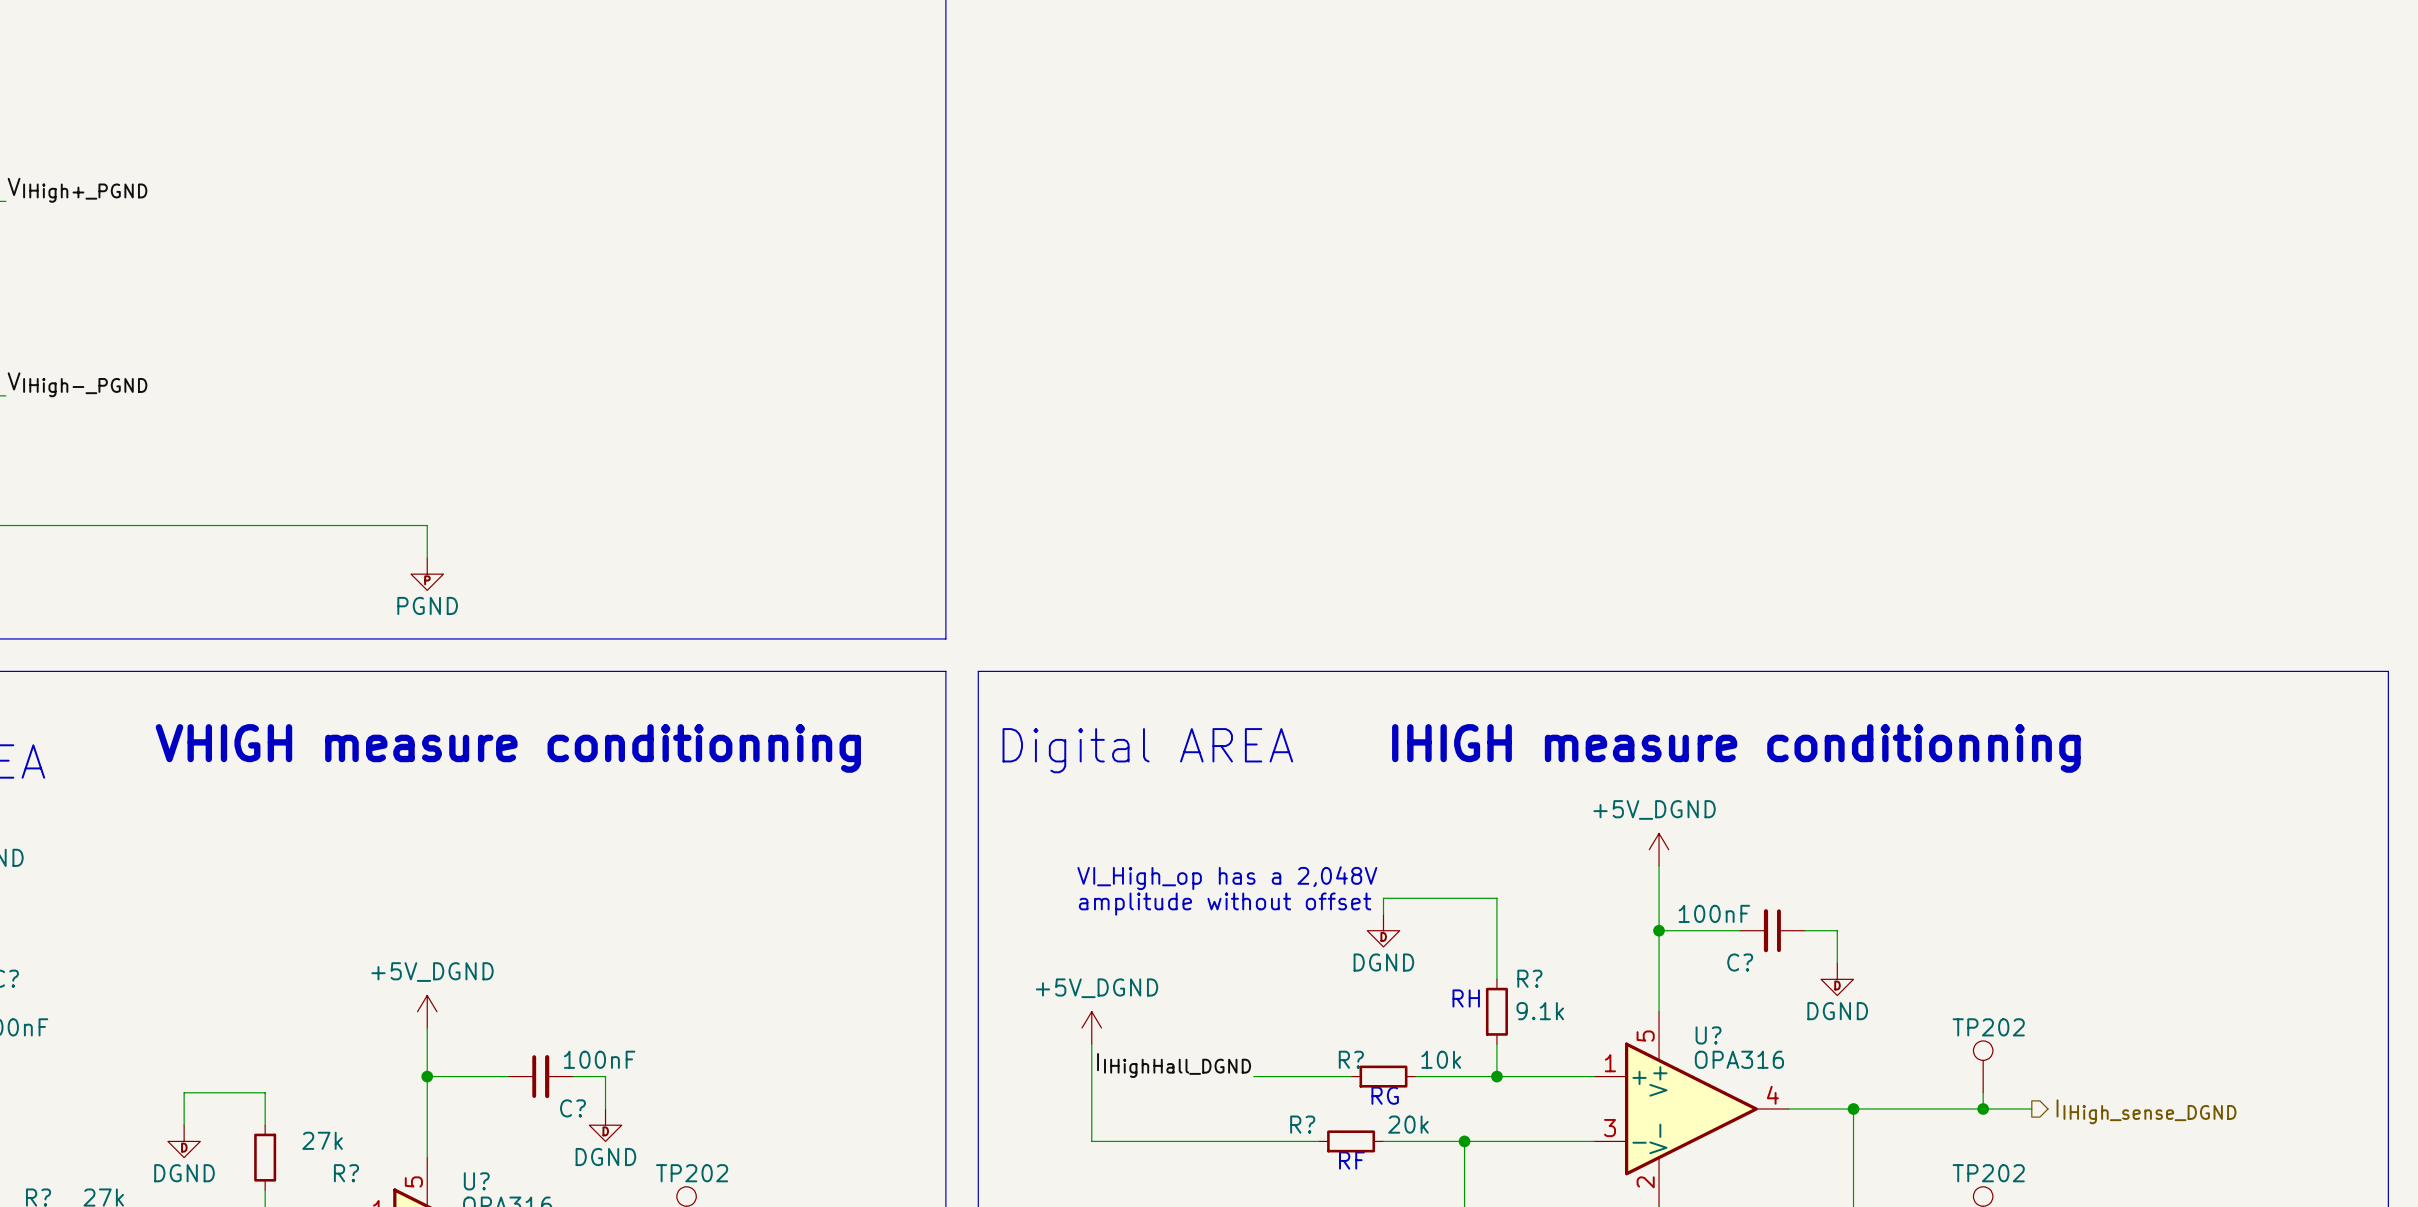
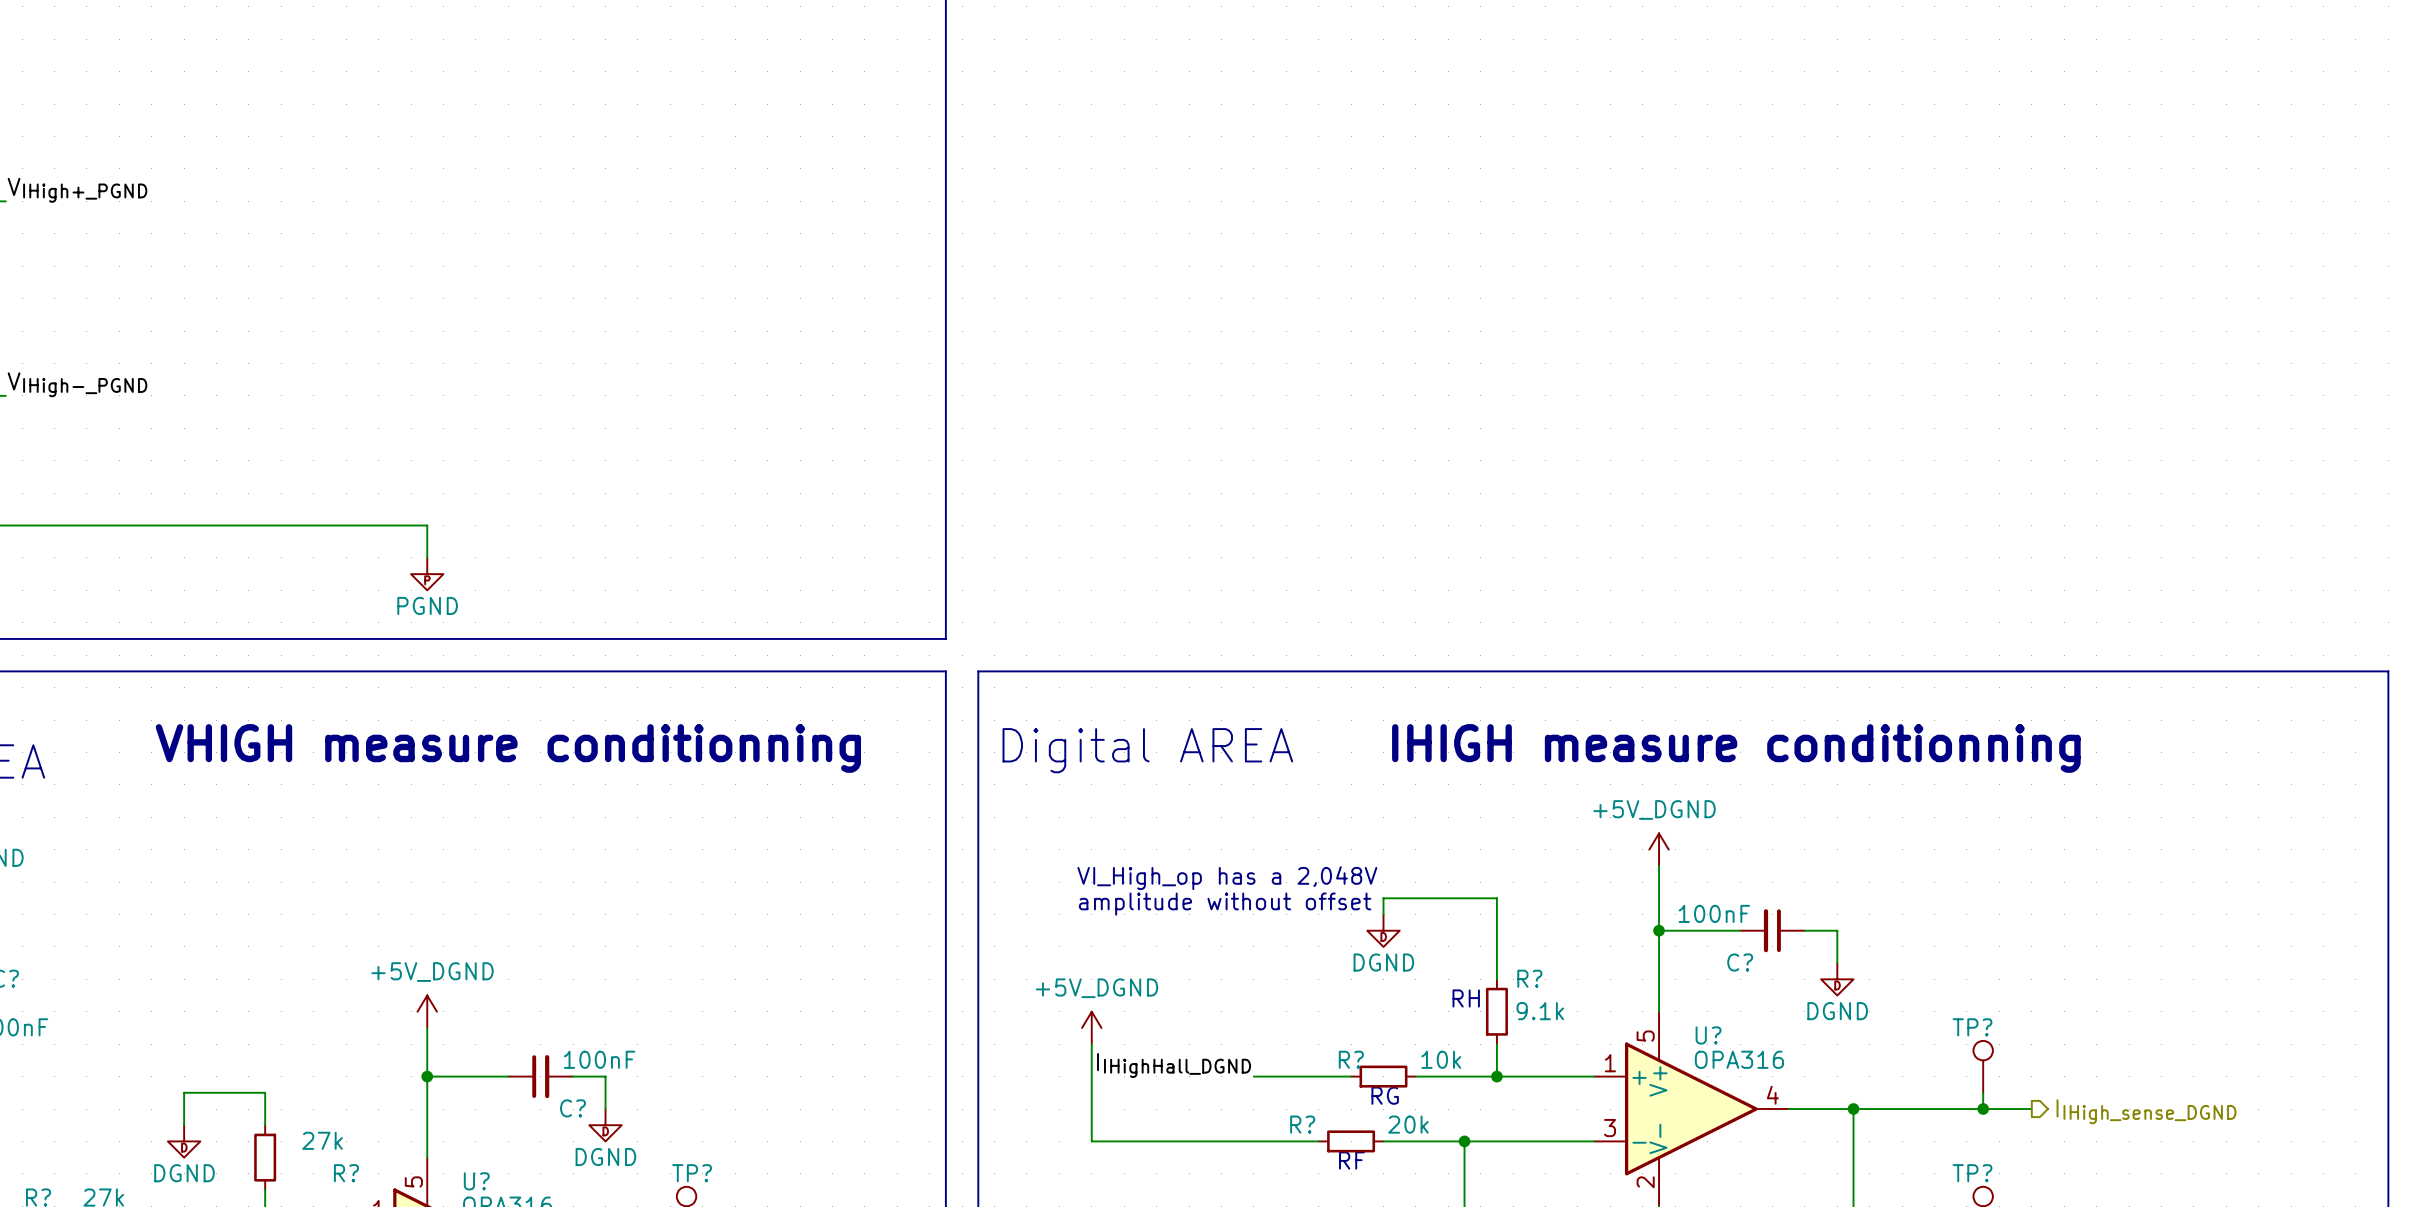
TP202 name: TP202 (1988, 1027) -> TP? (1972, 1027)
TP202 name: TP202 (692, 1173) -> TP? (692, 1173)
TP202 name: TP202 (1988, 1173) -> TP? (1972, 1173)

